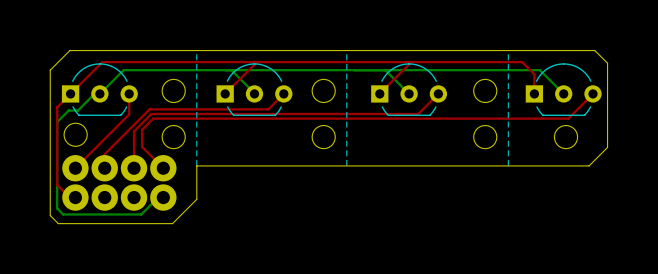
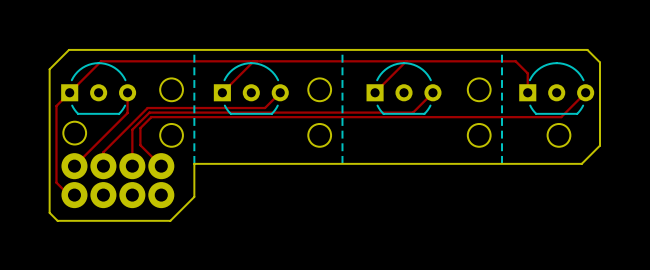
bottom track: (231, 70) (254, 93) -> none
bottom track: (385, 70) (409, 93) -> none
bottom track: (563, 93) (539, 70) (123, 70) (99, 93) (94, 93) (77, 110) (68, 110) (57, 122) (57, 208) (63, 214) (141, 214) (157, 197) -> none

